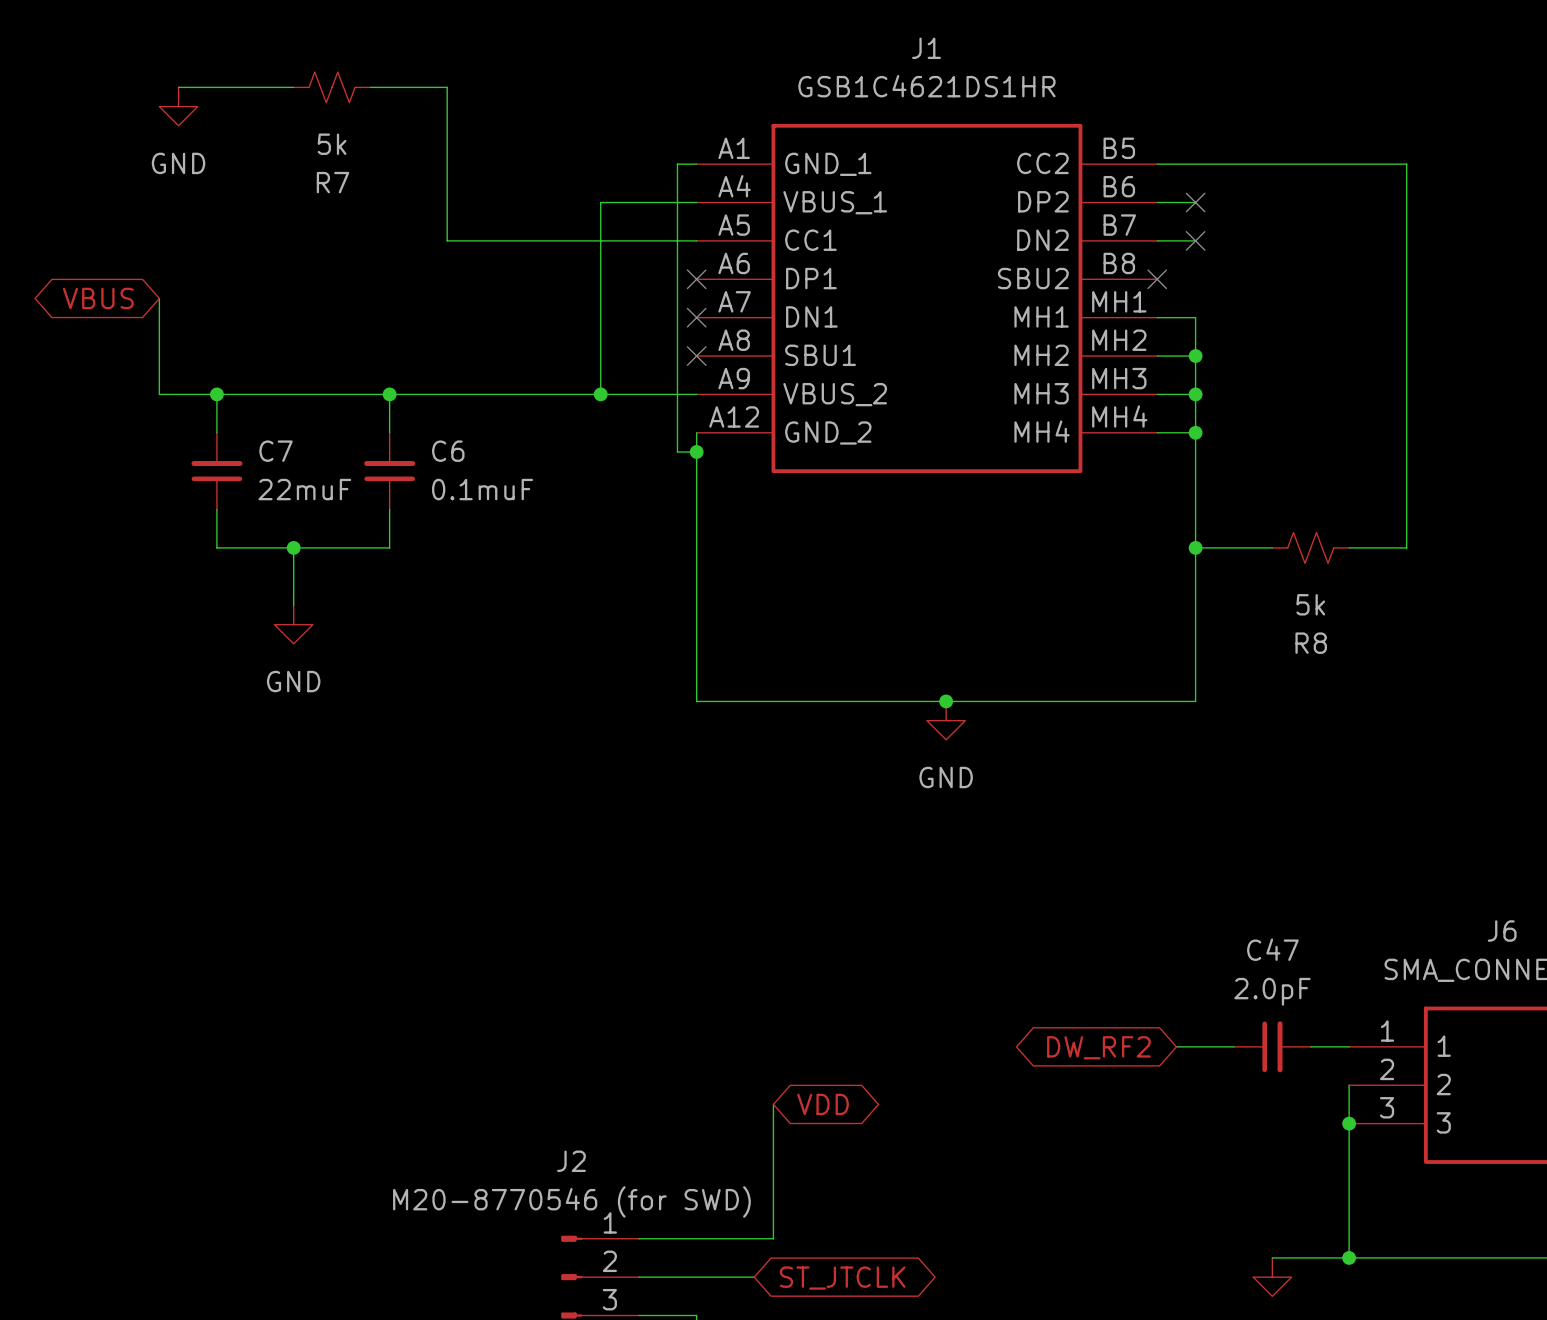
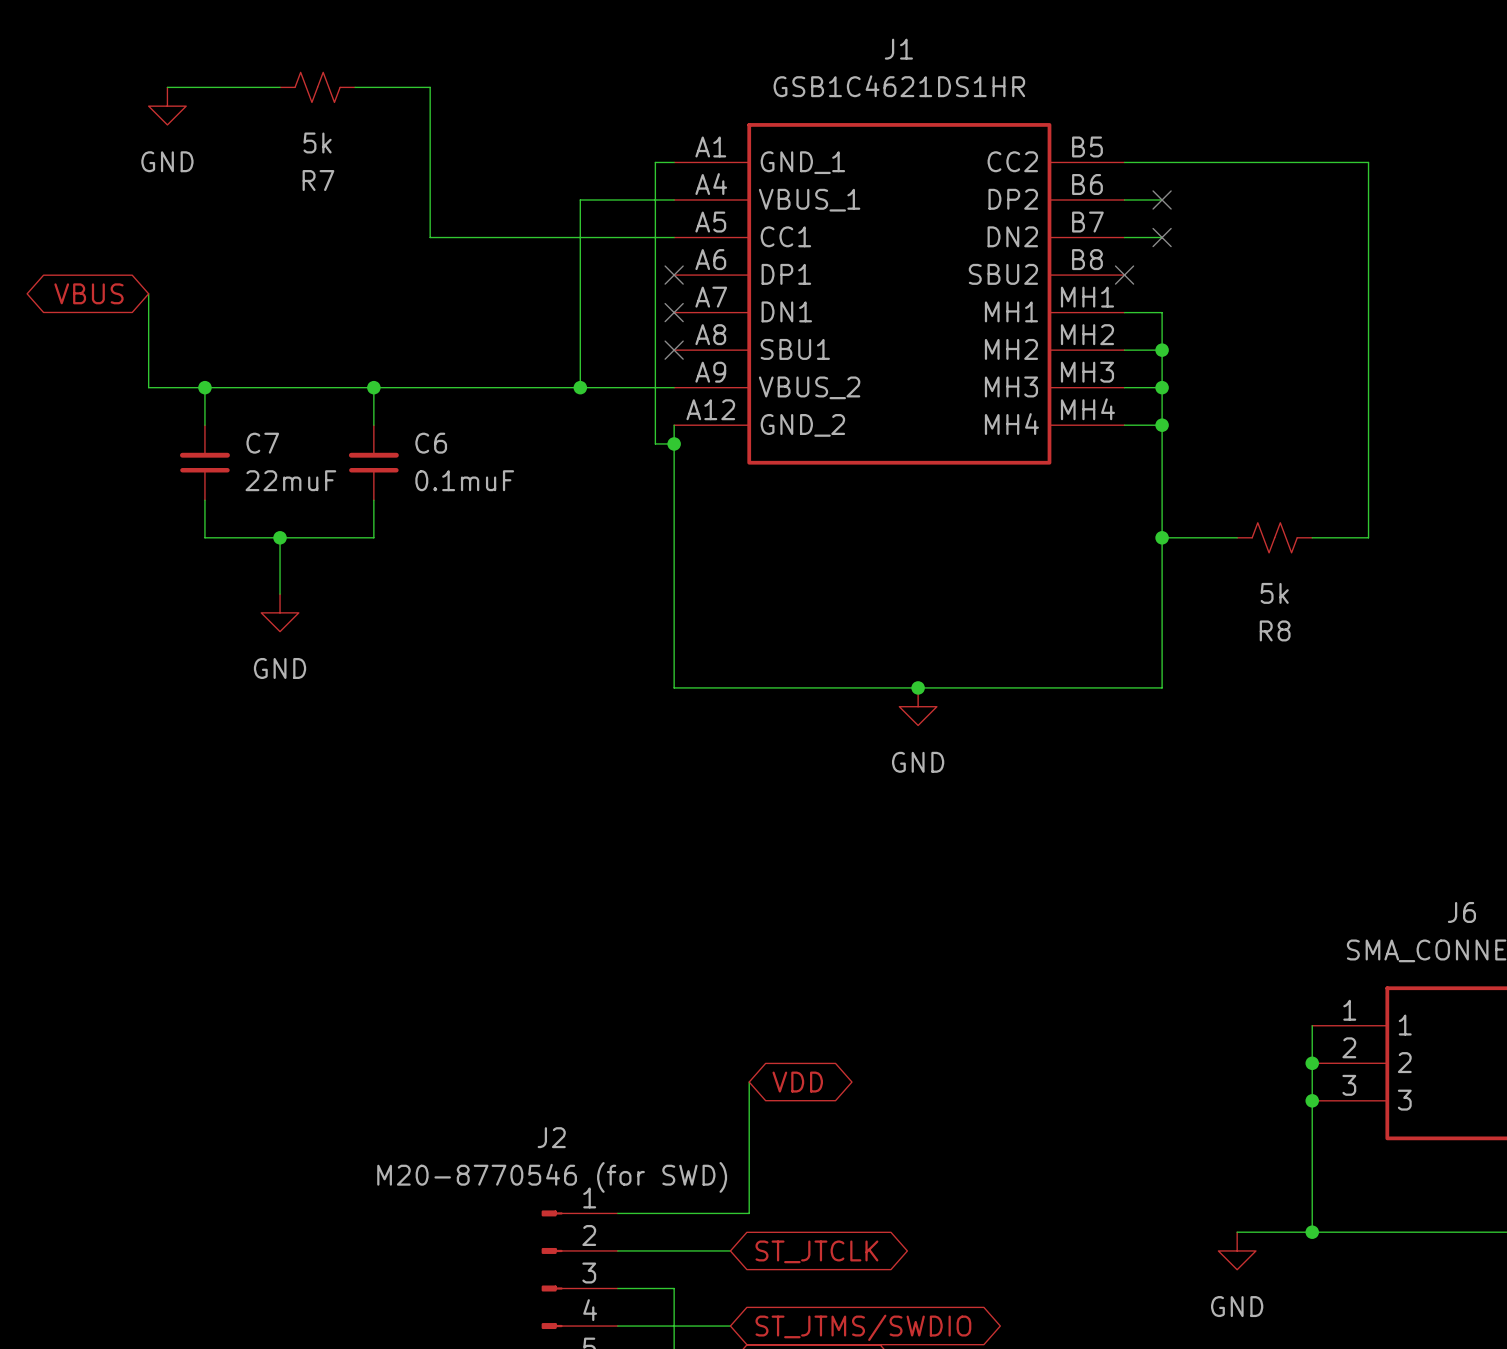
wire: (1176, 1046) (1233, 1046) -> none
C47: 2.0pF (1272, 1046) -> none
wire: (1310, 1046) (1349, 1046) -> (1312, 1063) (1312, 1025)
global label: DW_RF2 (1098, 1047) -> none
junction: none -> (1312, 1063)

